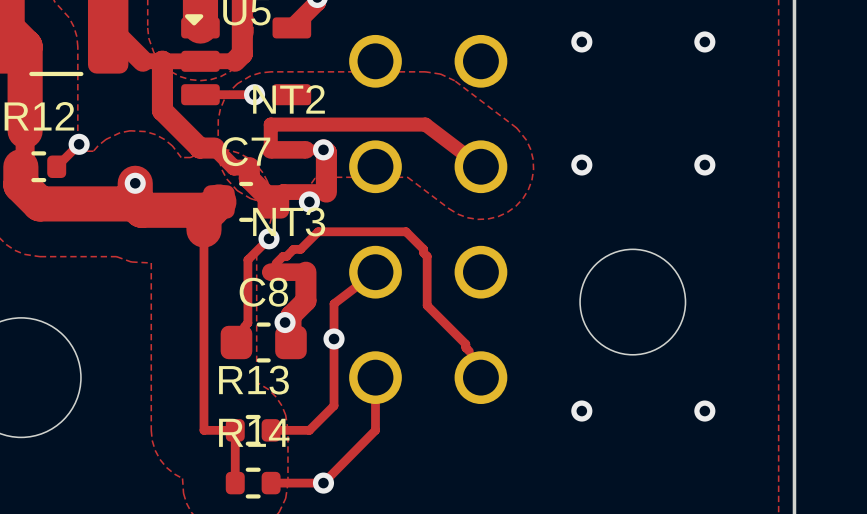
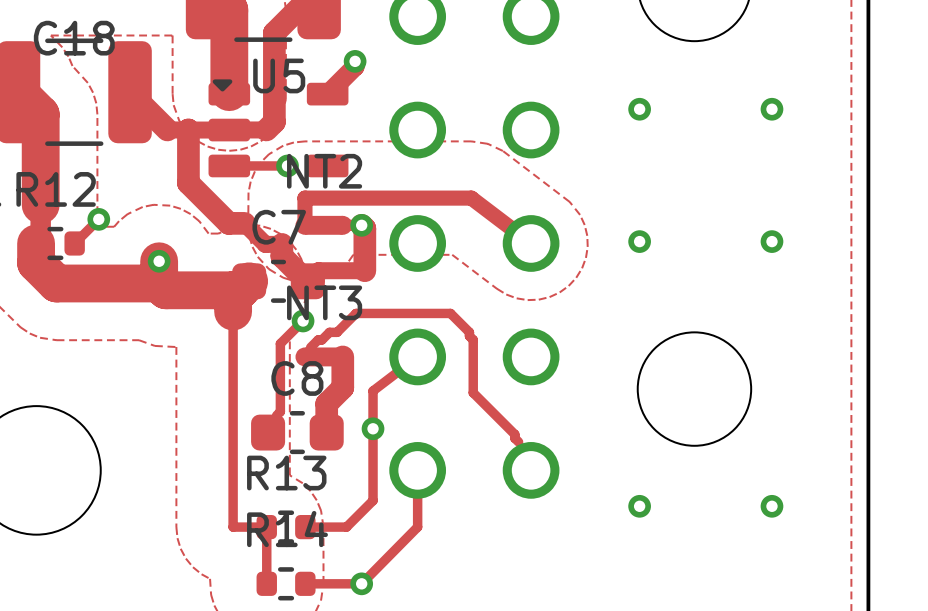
via: (309, 201) -> none
via: (285, 322) -> none

